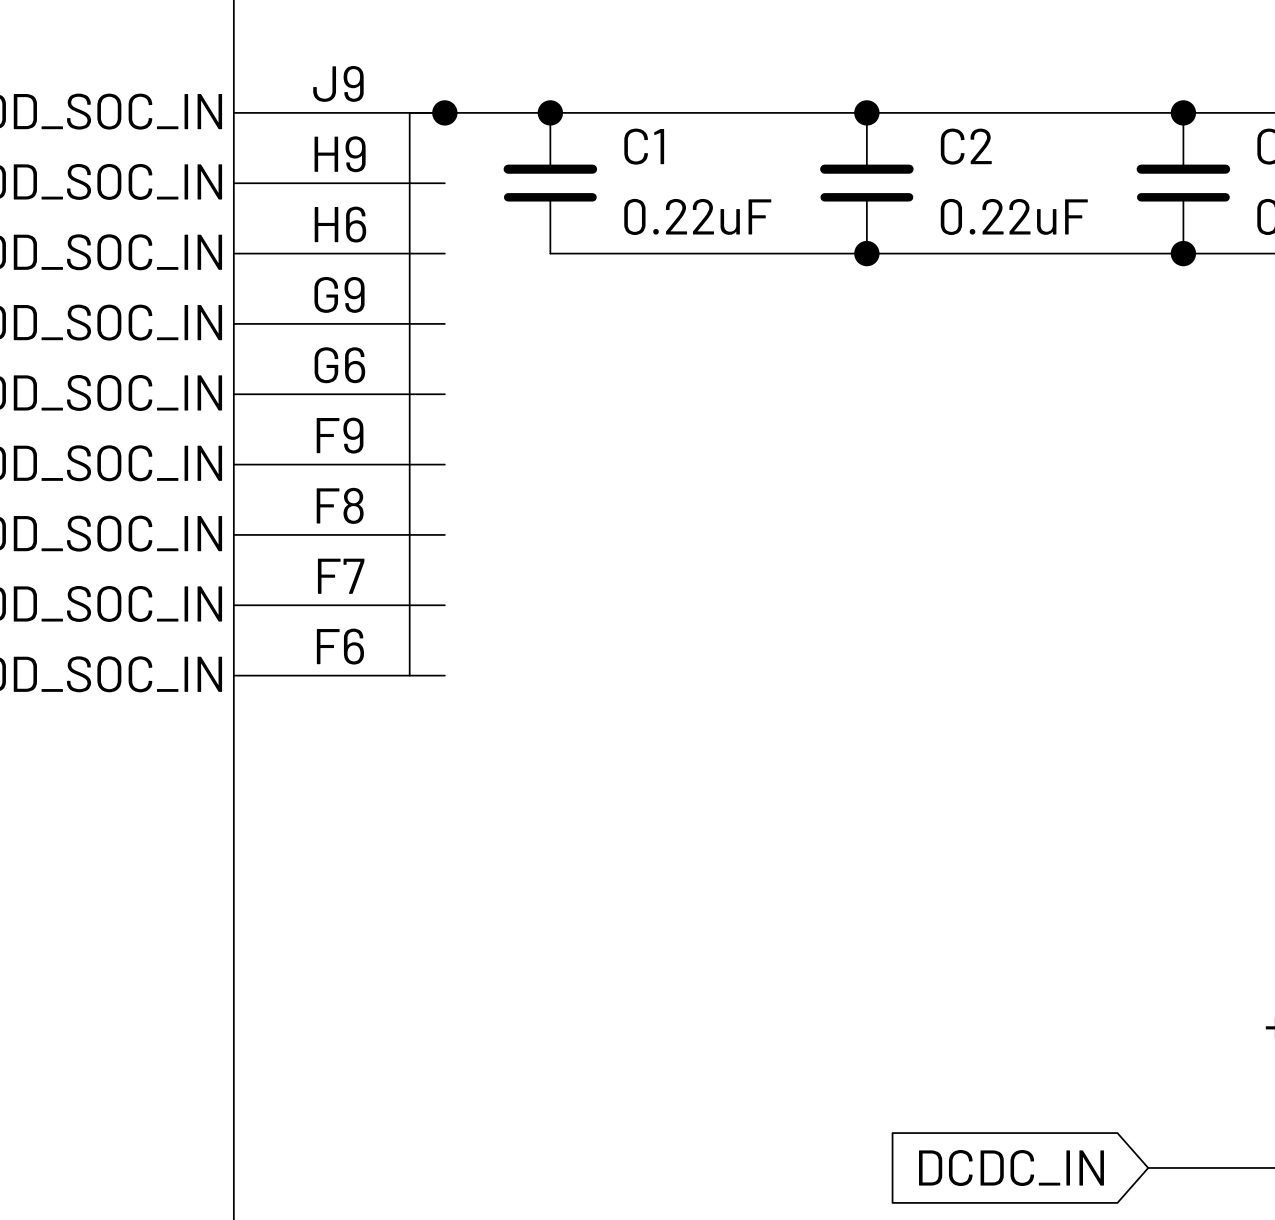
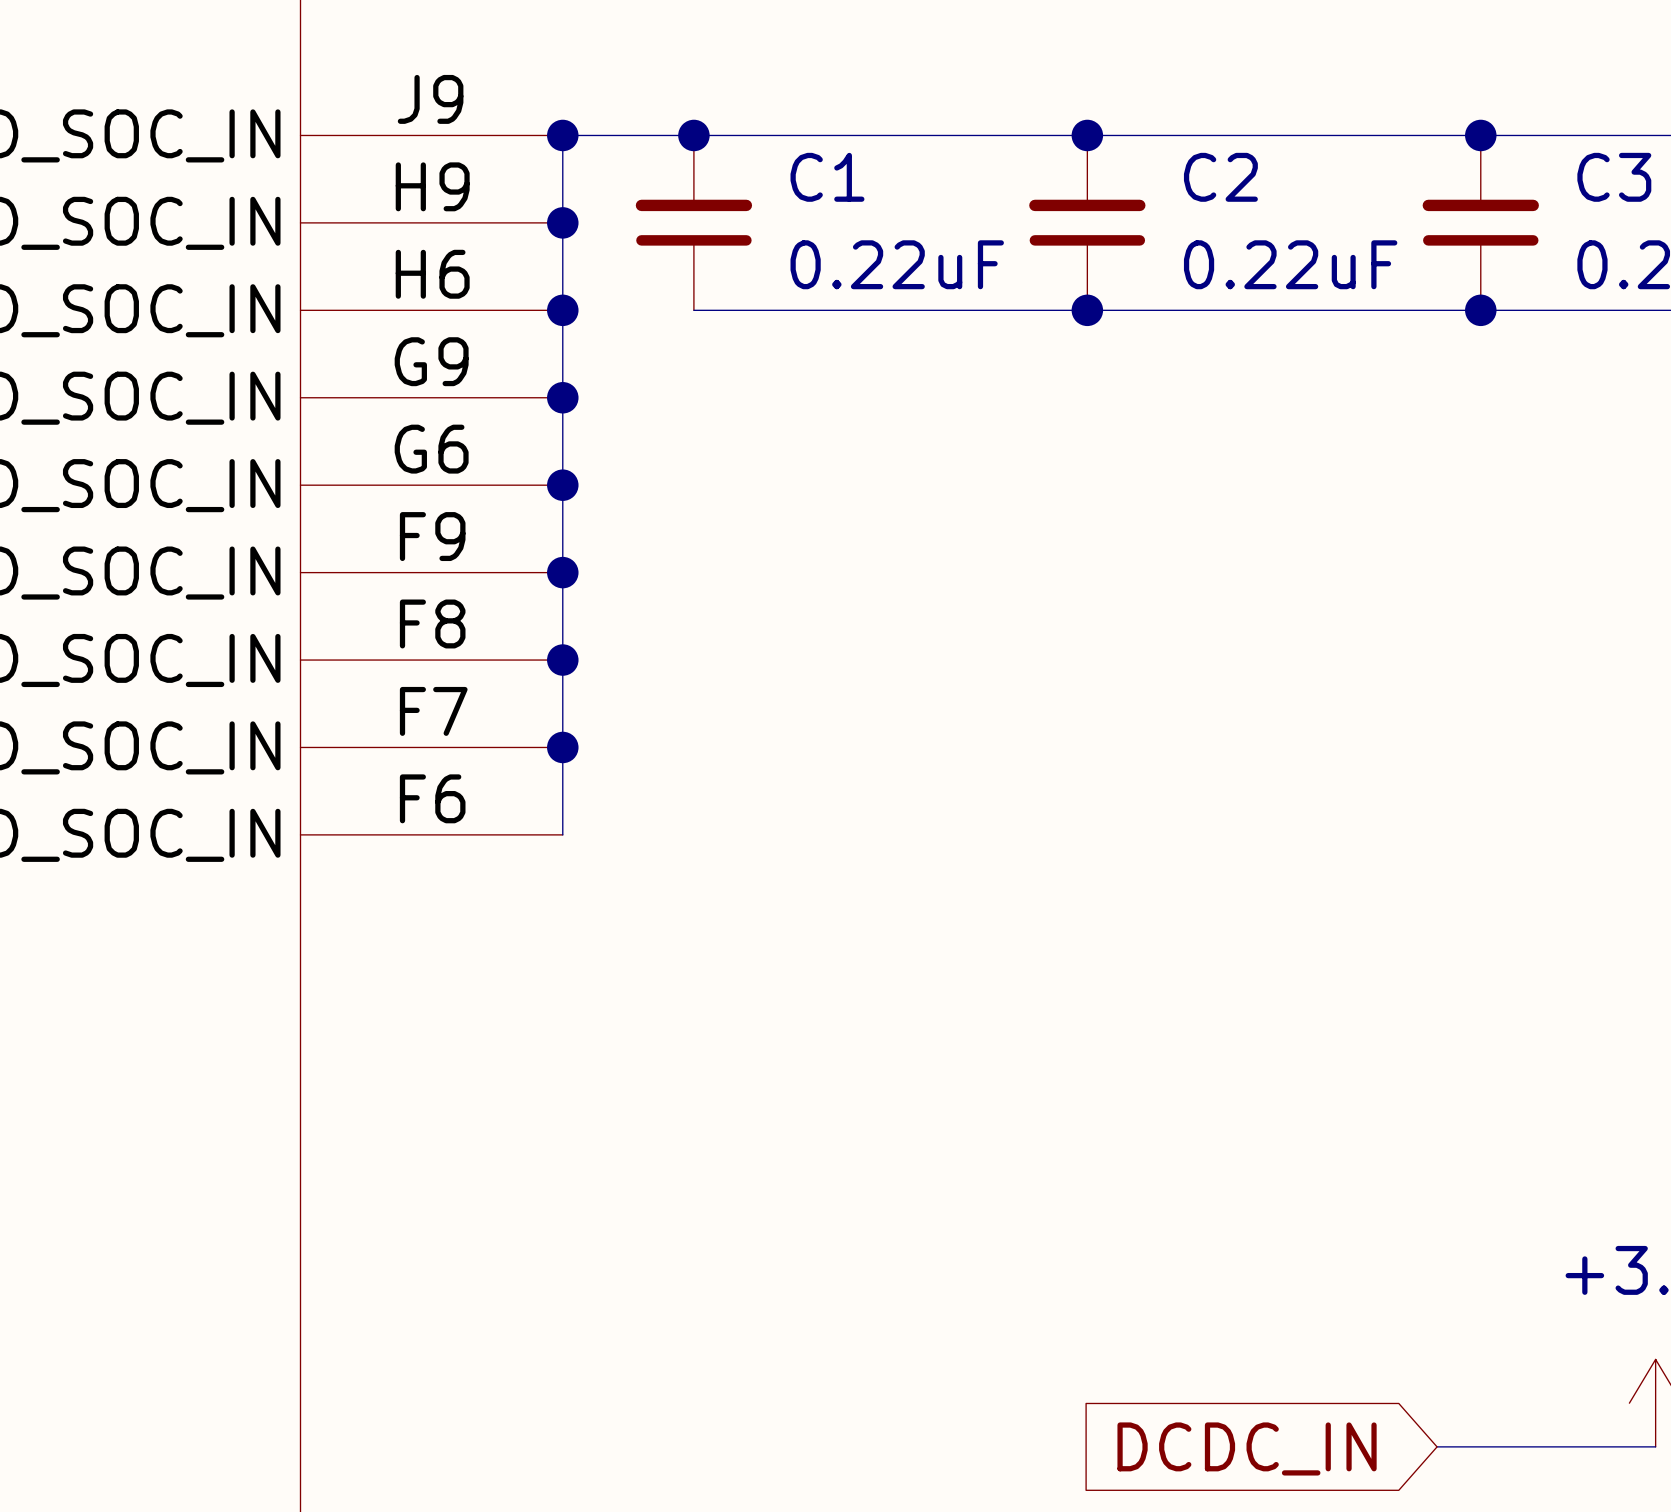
wire: (444, 112) (409, 112) (409, 675) -> (562, 135) (562, 834)
junction: none -> (562, 222)
junction: none -> (562, 310)
junction: none -> (562, 397)
junction: none -> (562, 485)
junction: none -> (562, 572)
junction: none -> (562, 660)
junction: none -> (562, 747)

